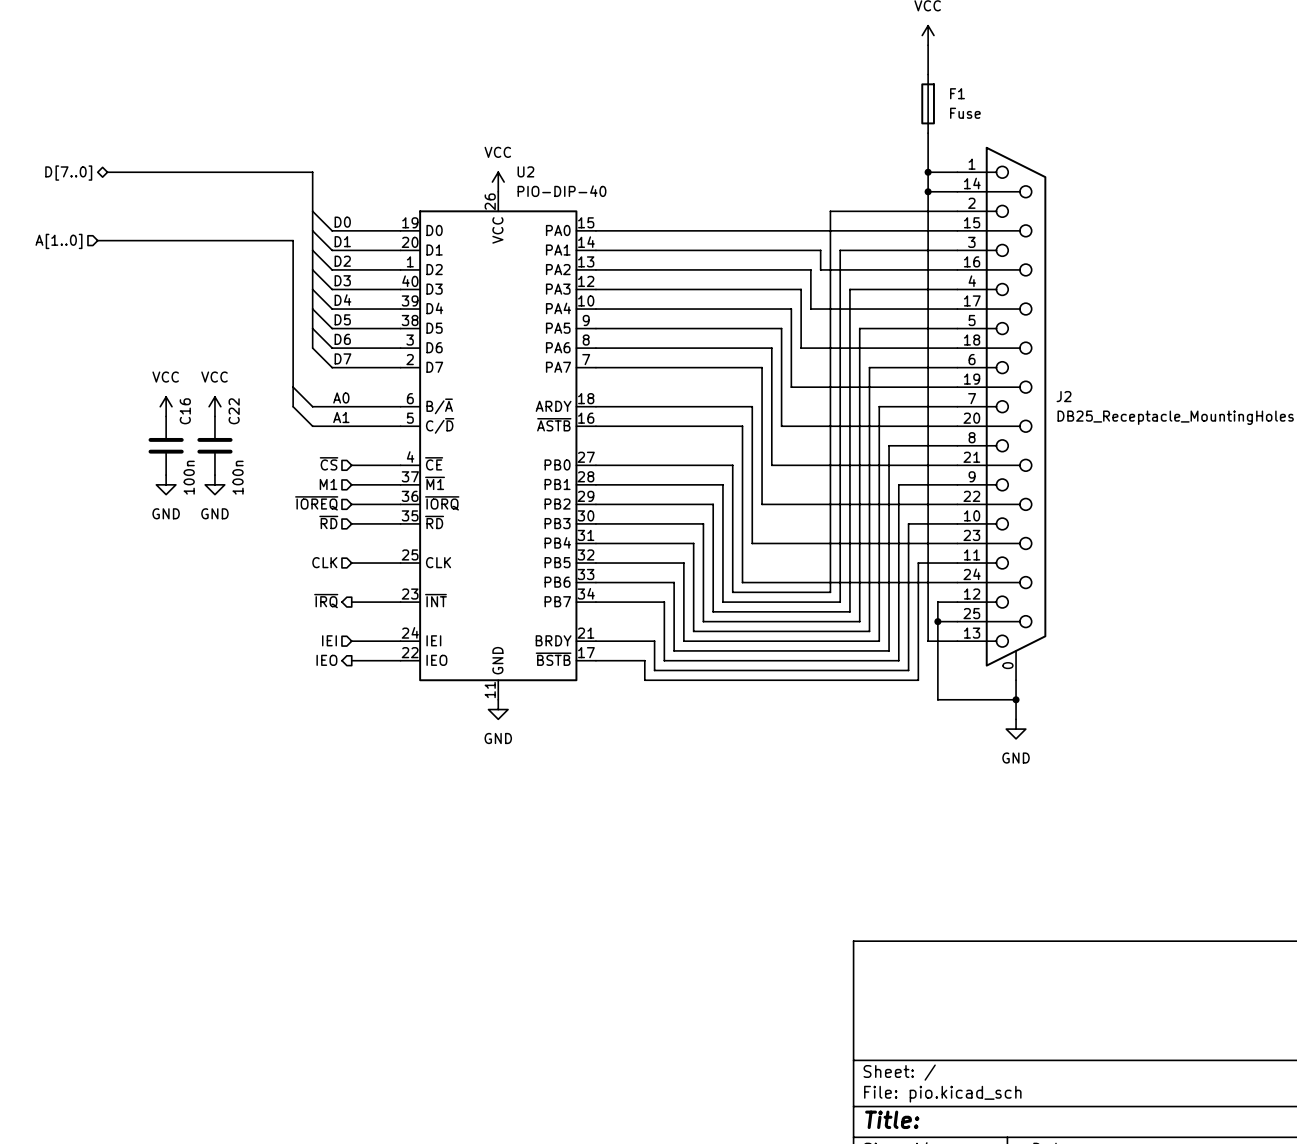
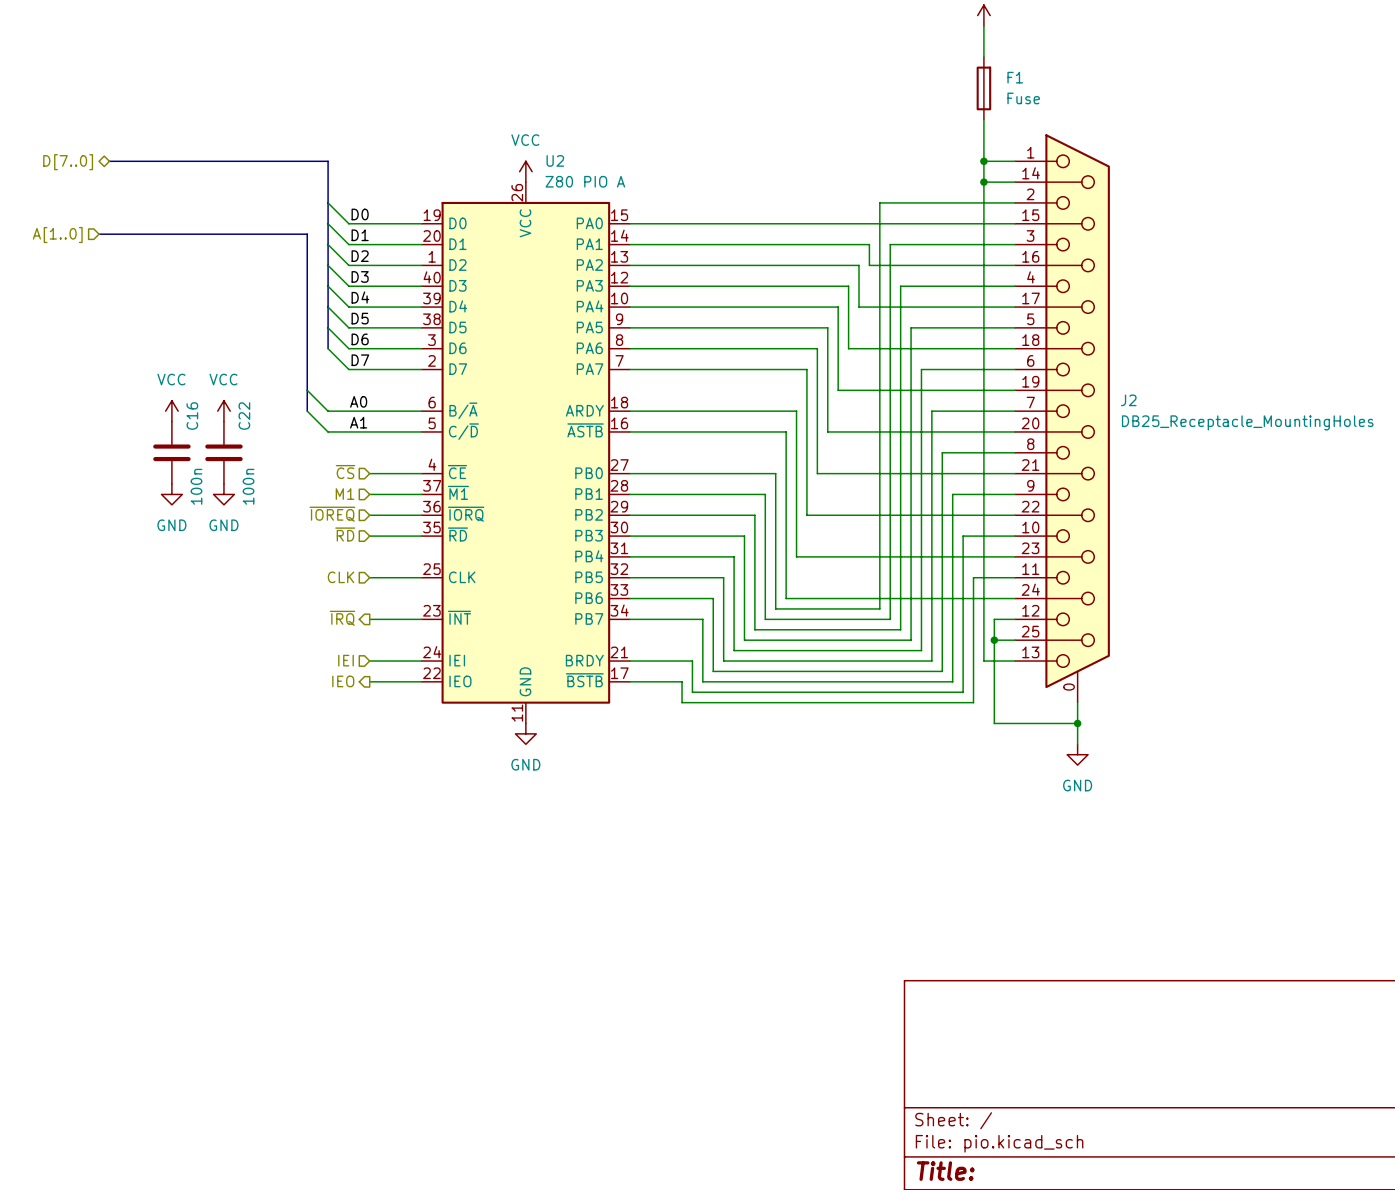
U2 value: PIO-DIP-40 (561, 191) -> Z80 PIO A (585, 181)

